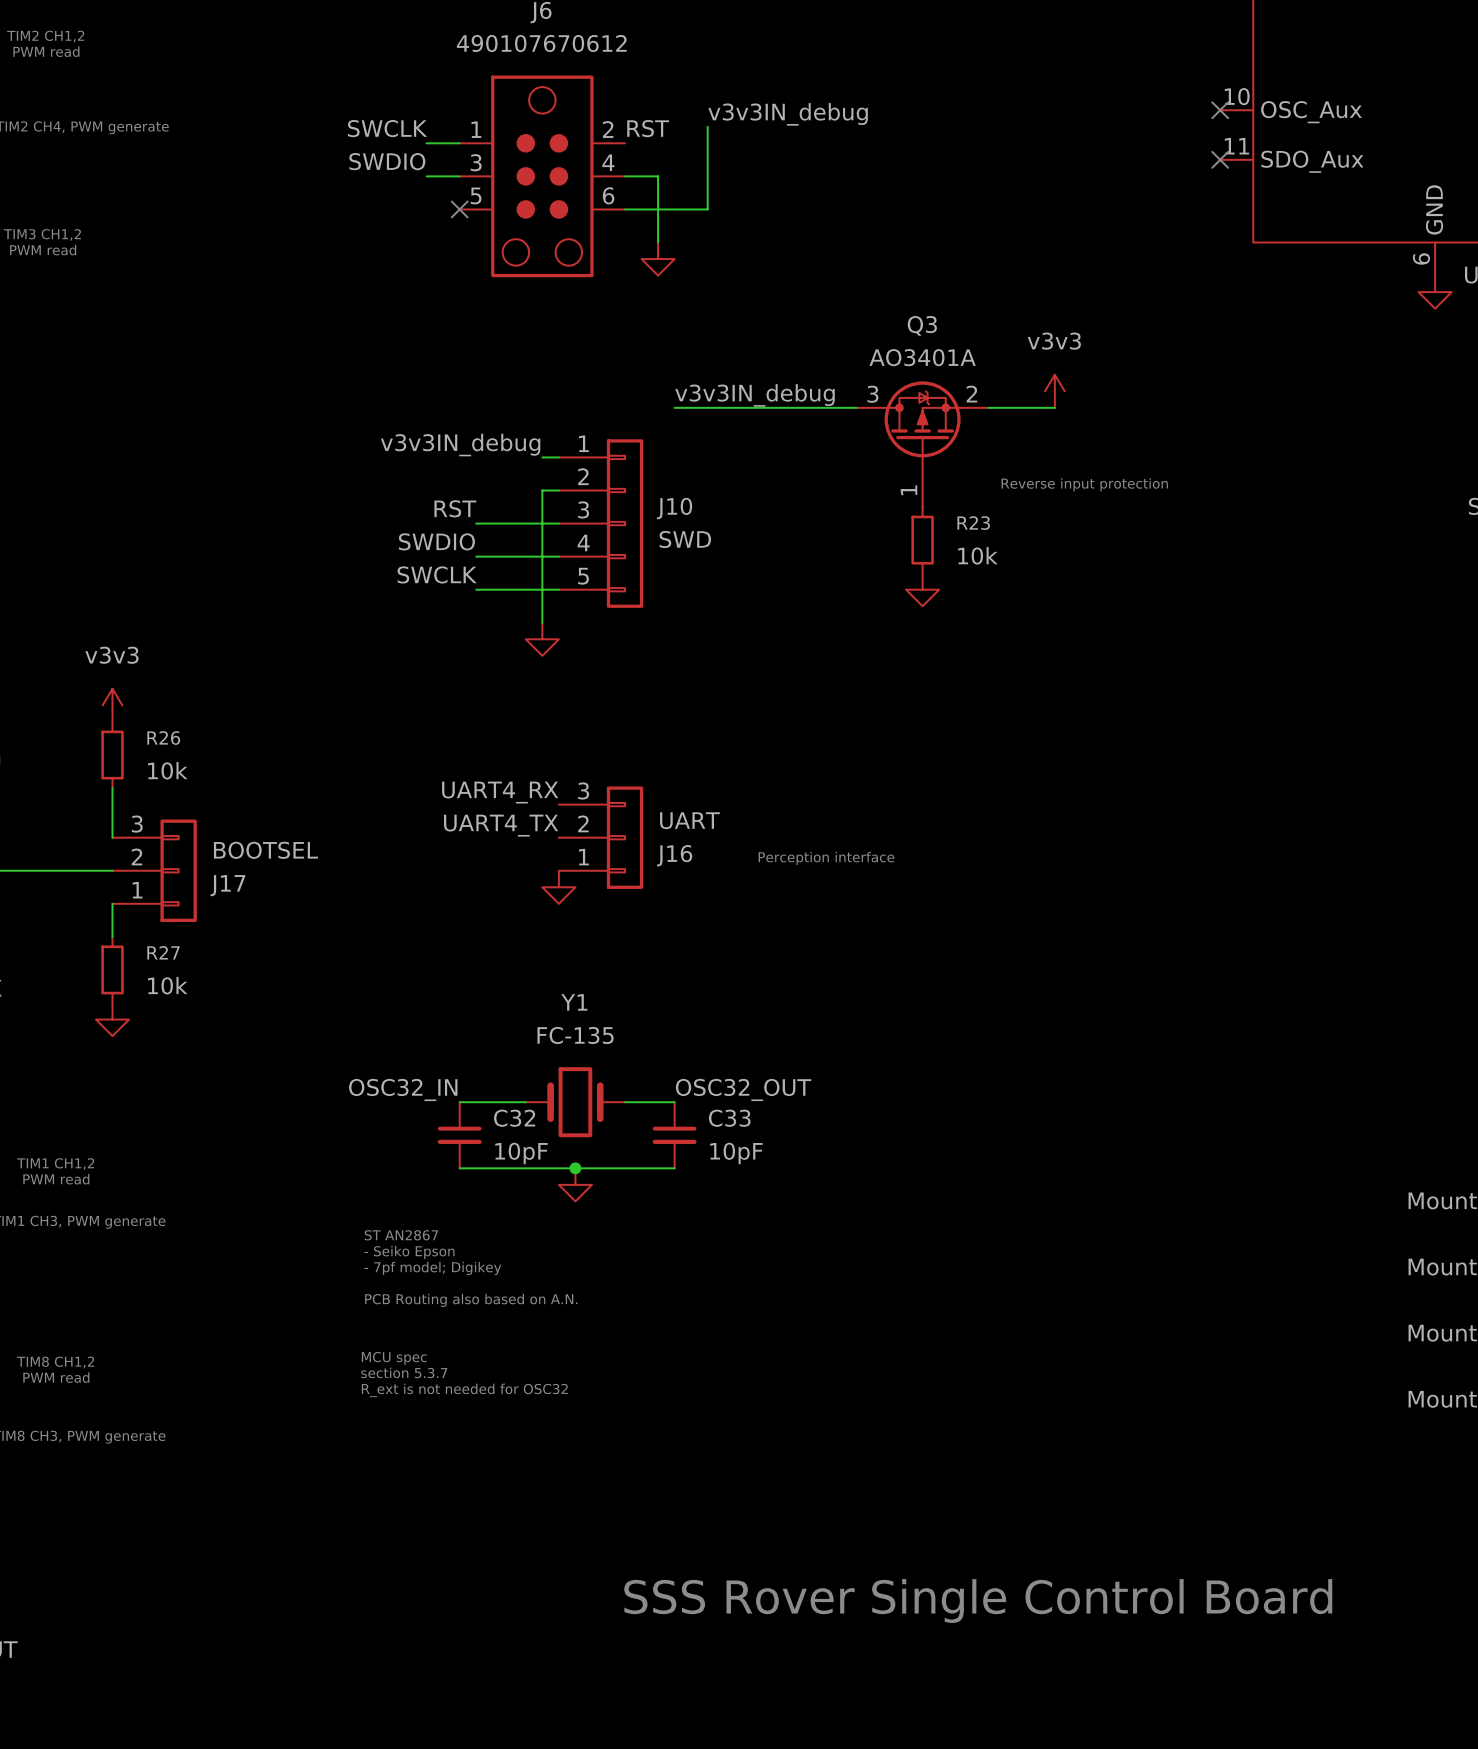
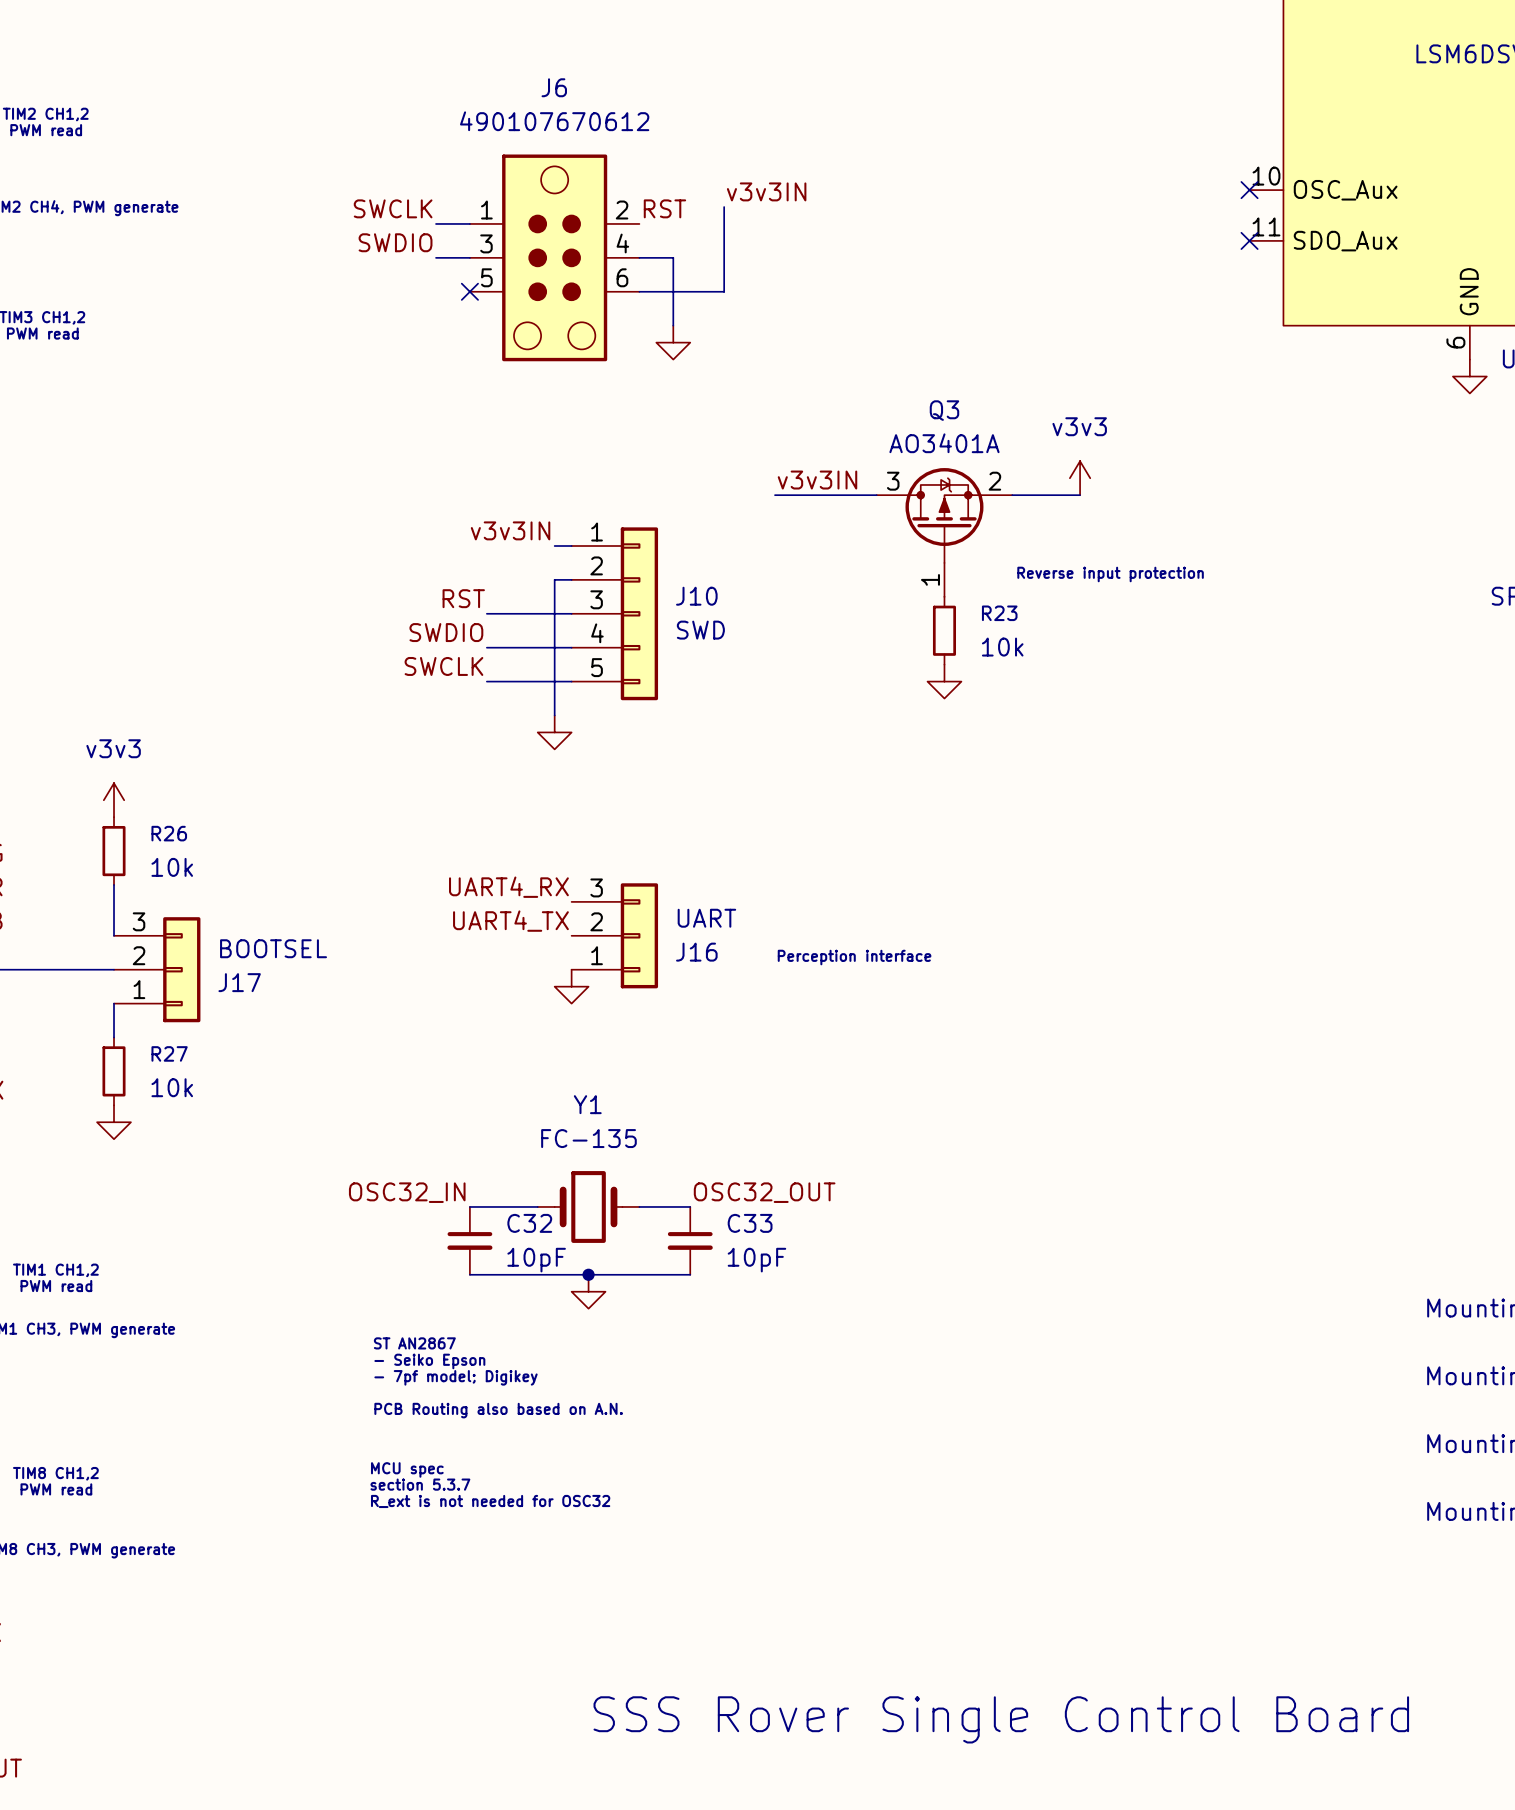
label: v3v3IN_debug (788, 114) -> v3v3IN (766, 191)
label: v3v3IN_debug (755, 395) -> v3v3IN (817, 480)
wire: (674, 407) (757, 407) -> none
label: v3v3IN_debug (460, 445) -> v3v3IN (510, 530)

